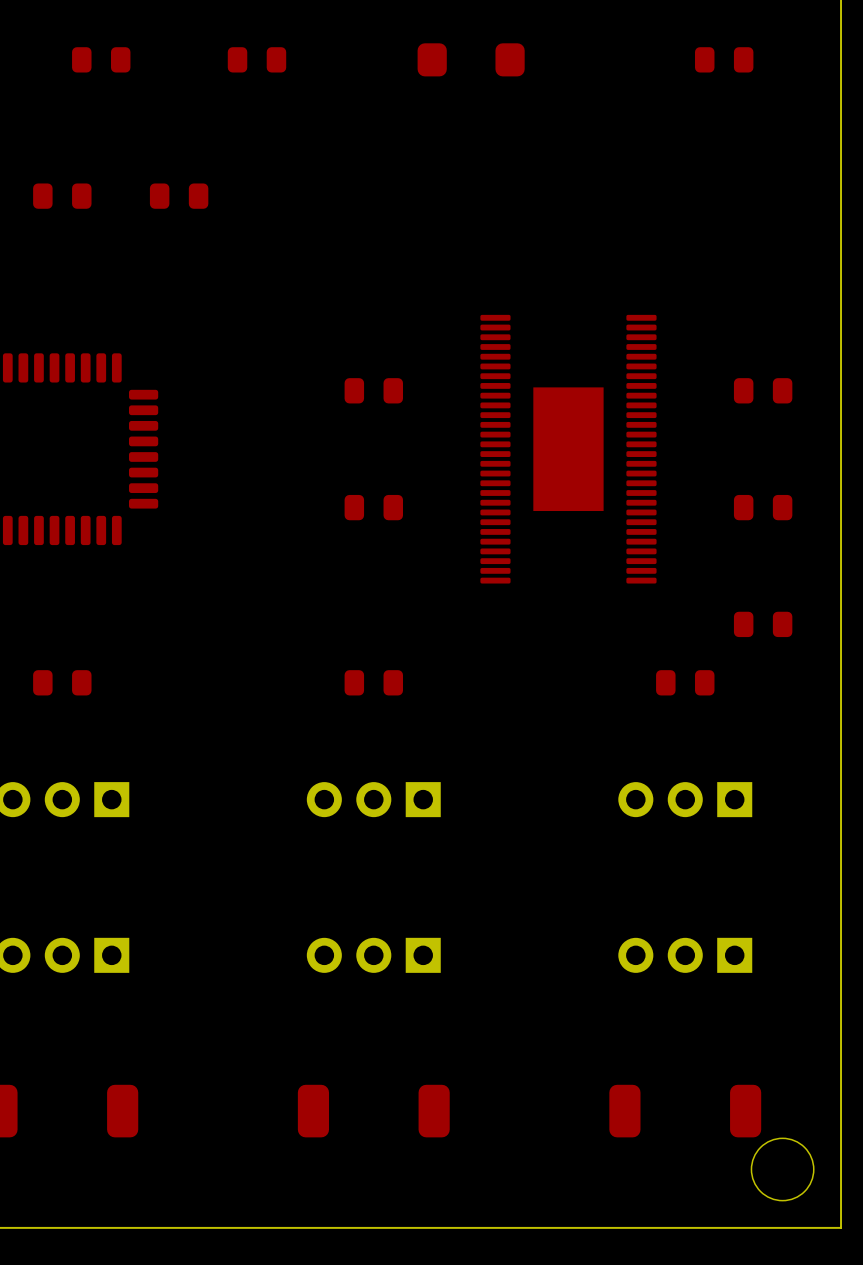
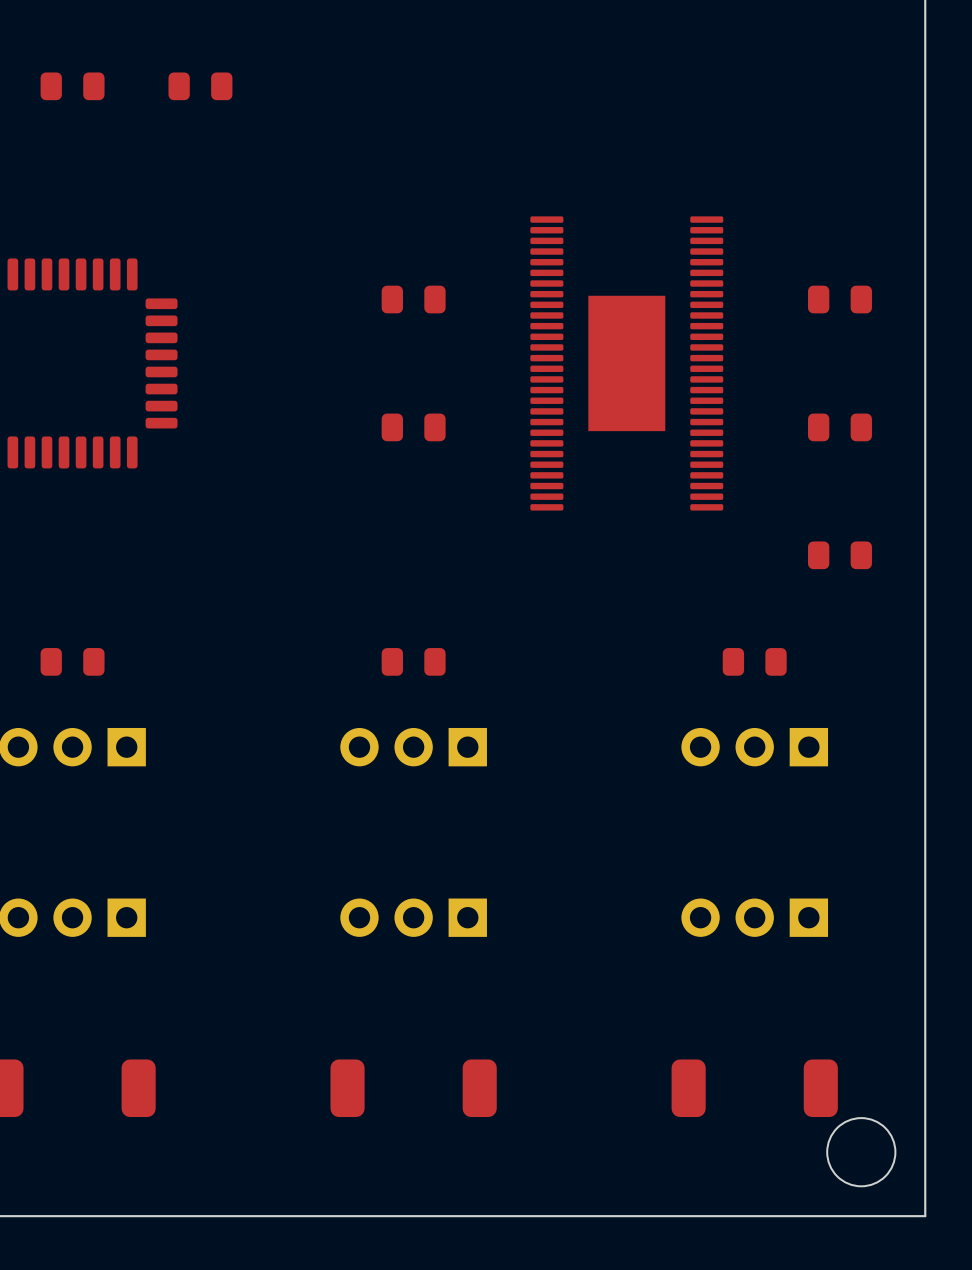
part position: (62, 682) -> (72, 661)
part position: (373, 682) -> (413, 661)
part position: (685, 682) -> (754, 661)

